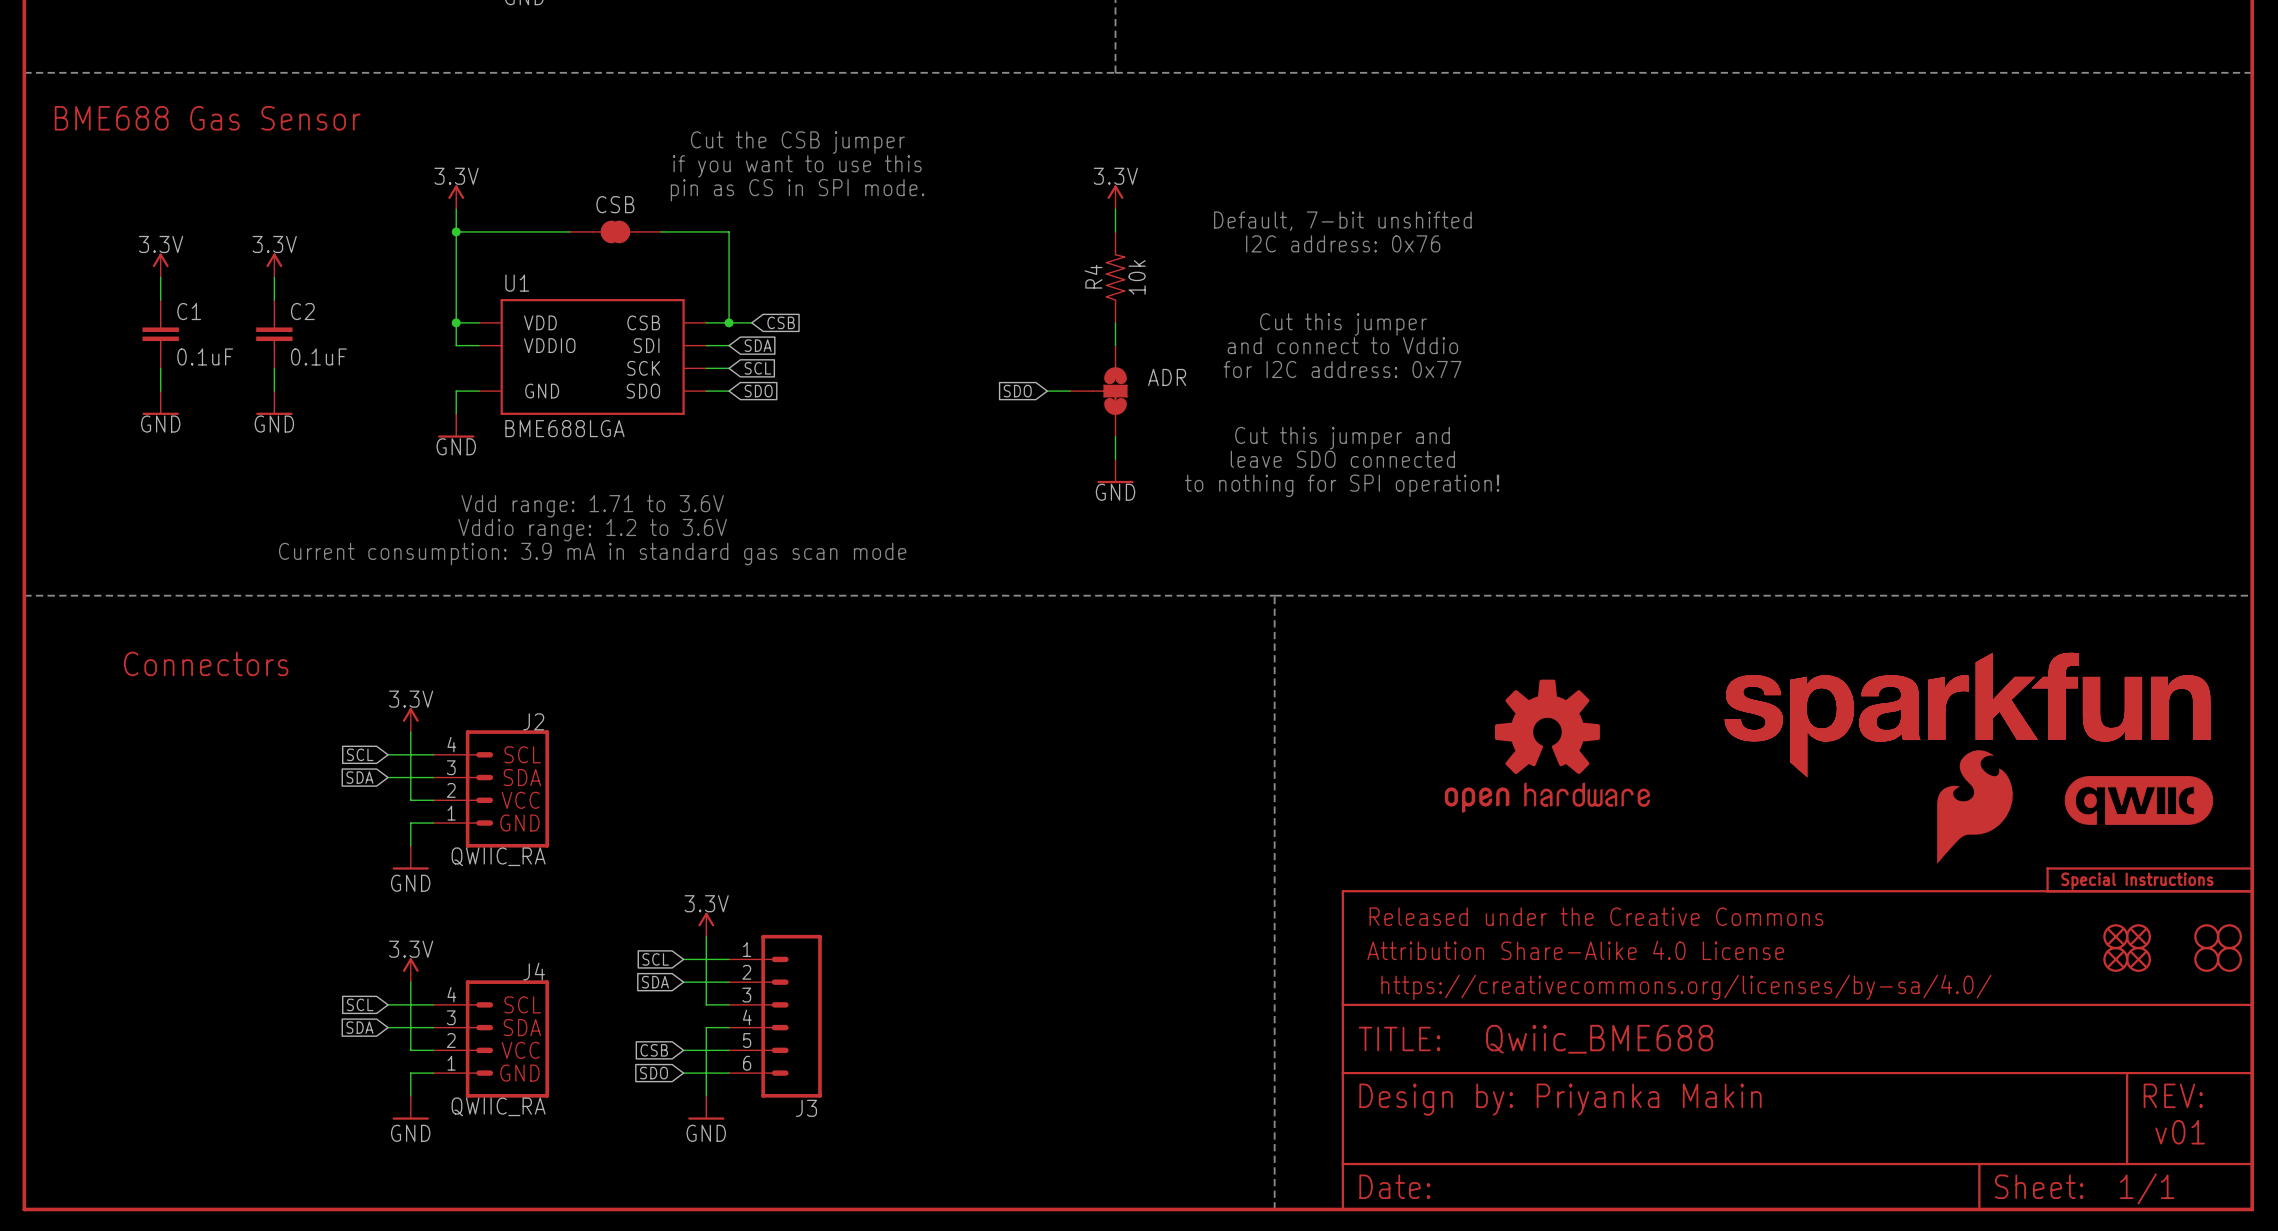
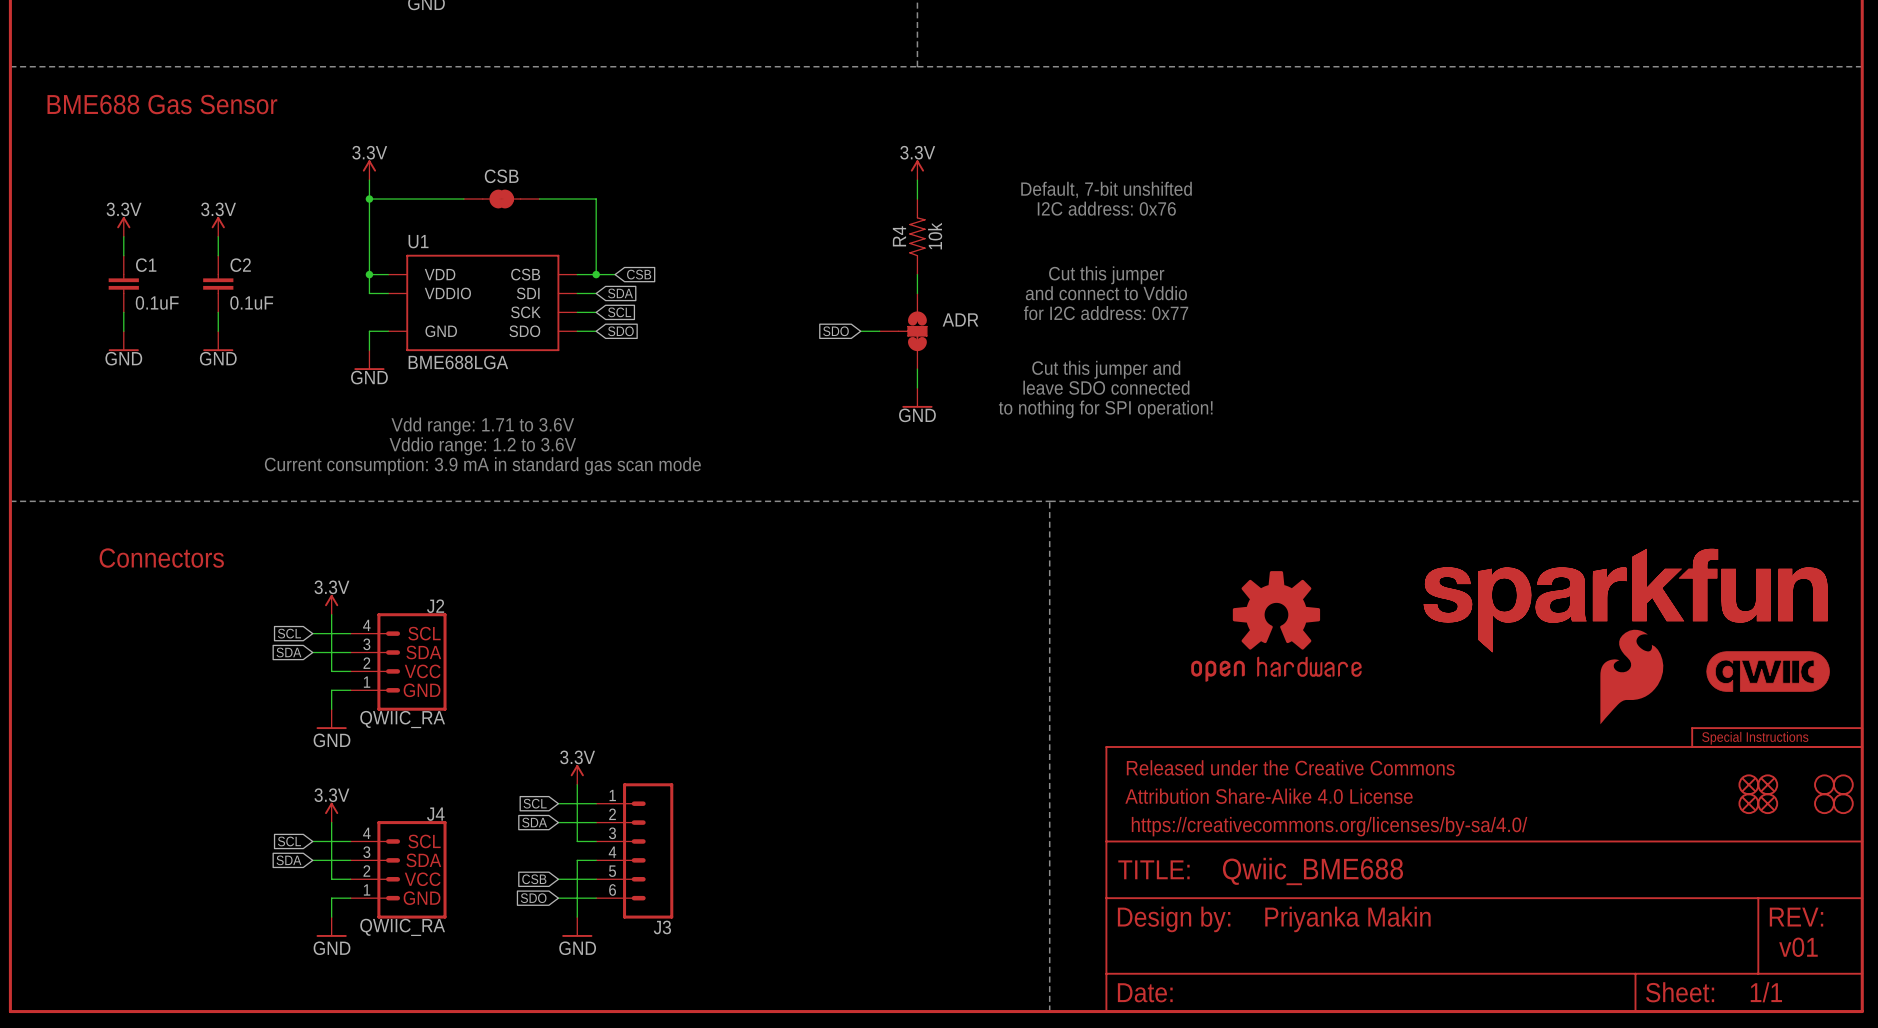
text: Cut the CSB jumper (797, 142) -> none
text: if you want to use this (797, 166) -> none
text: pin as CS in SPI mode. (797, 190) -> none

